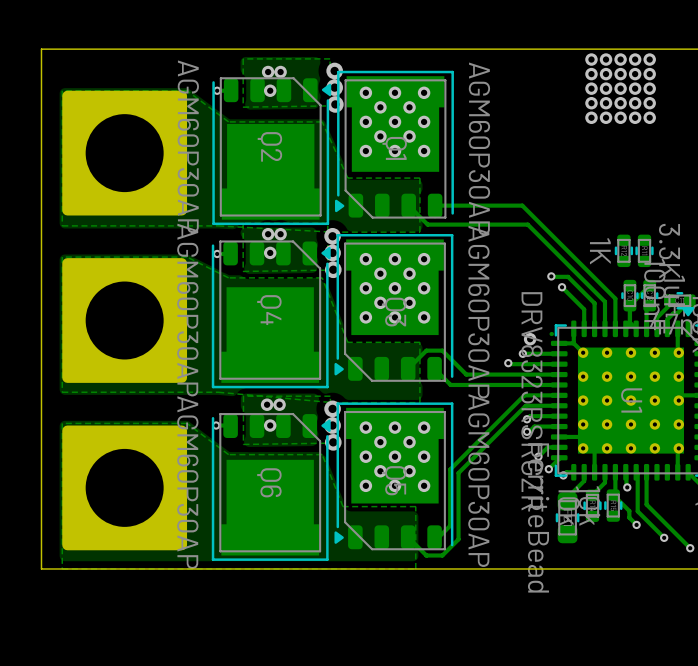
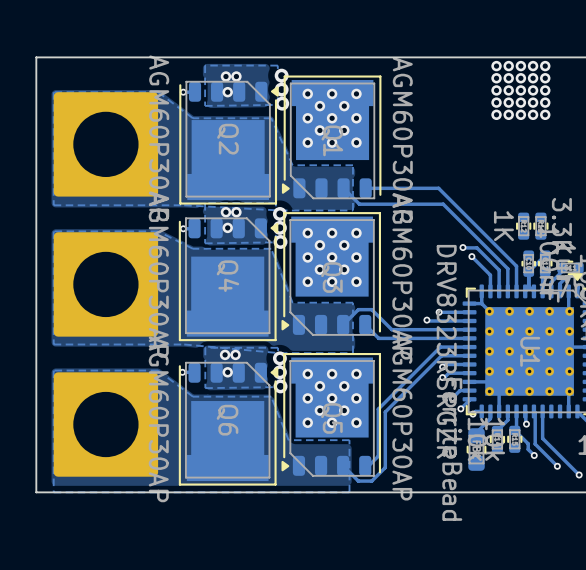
via: (530, 339) -> none

